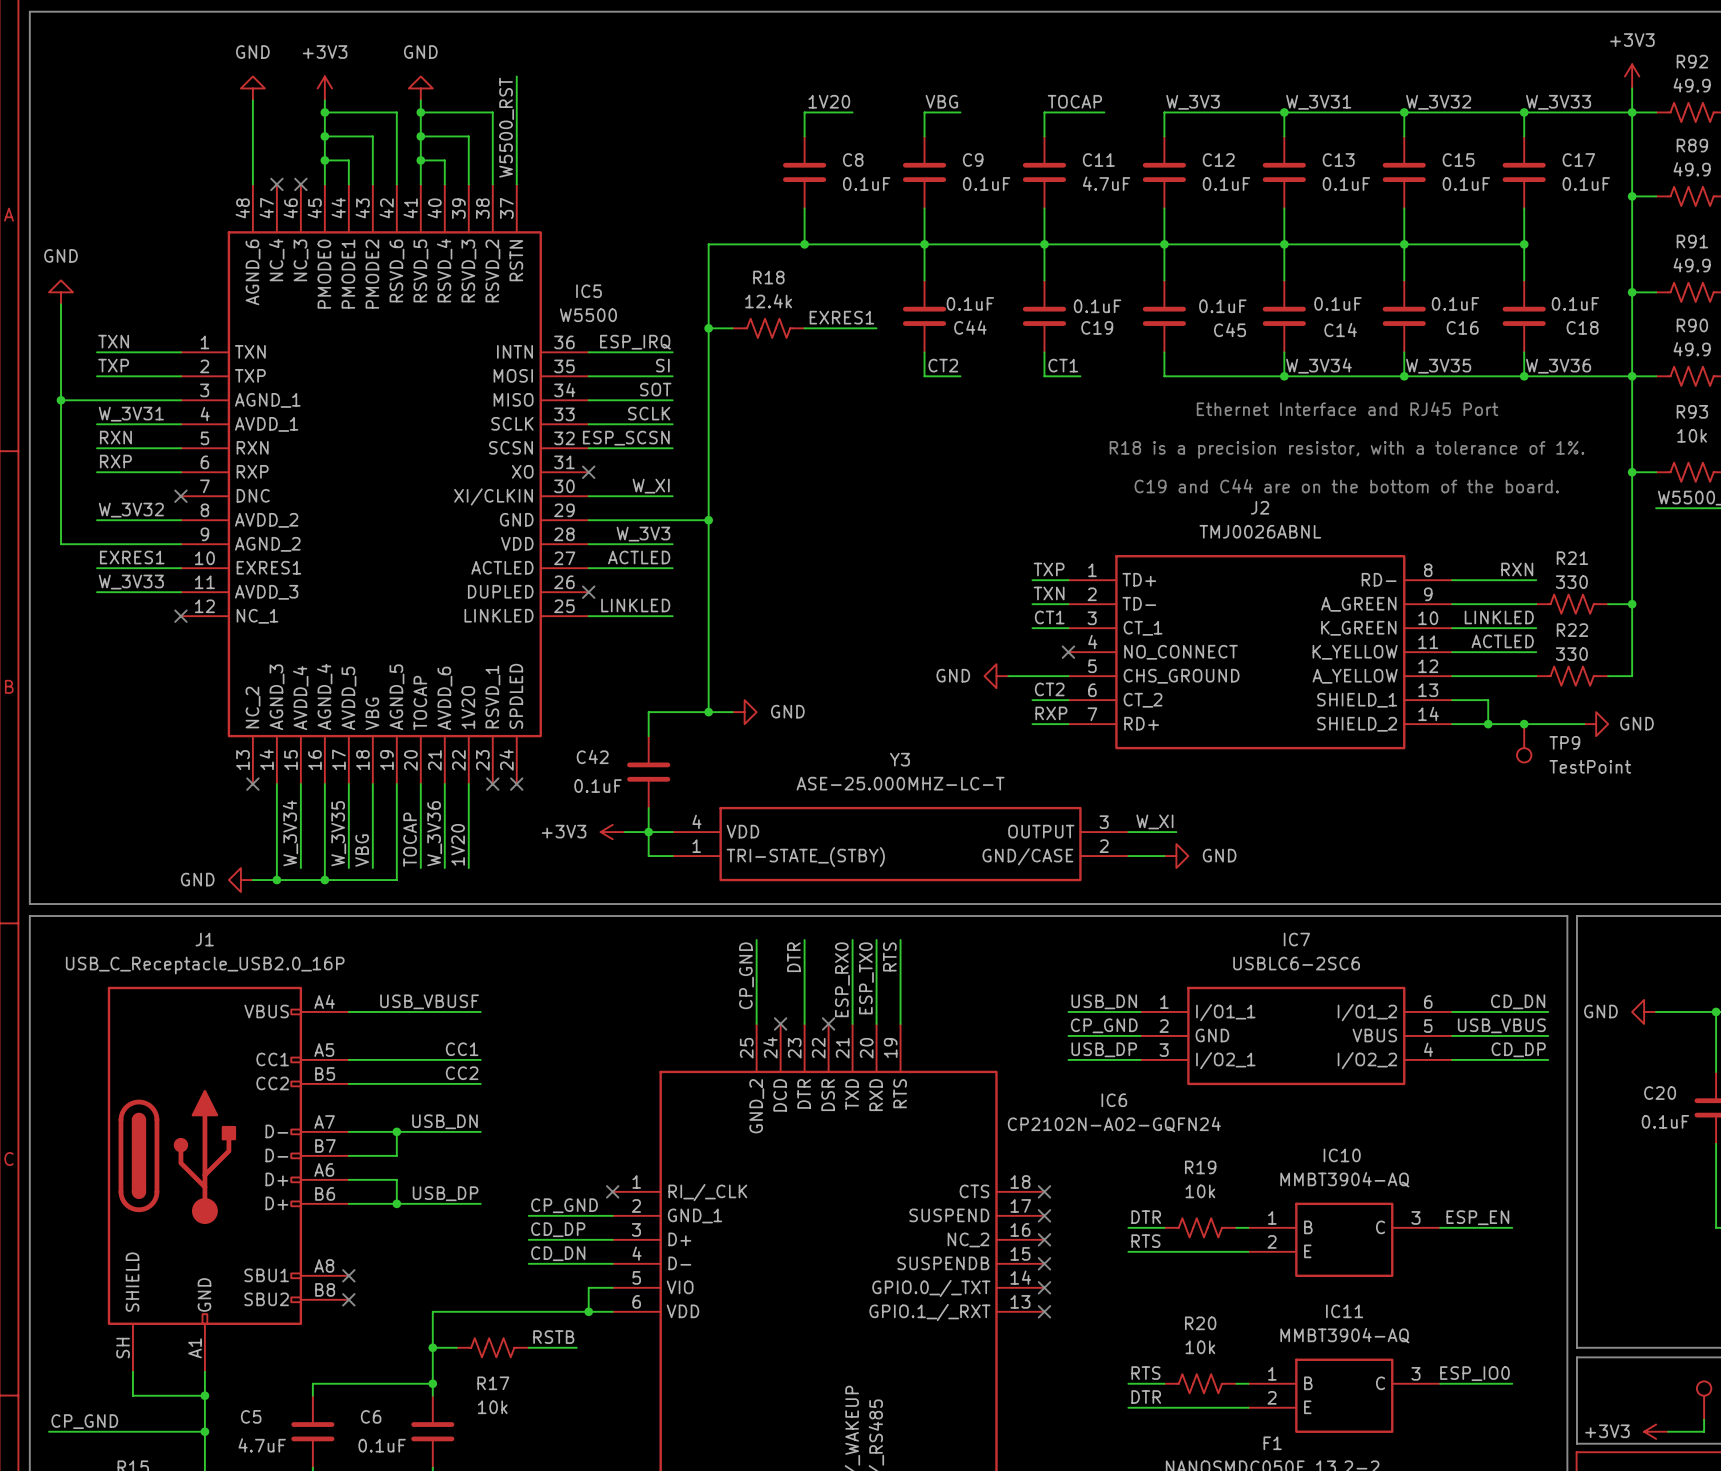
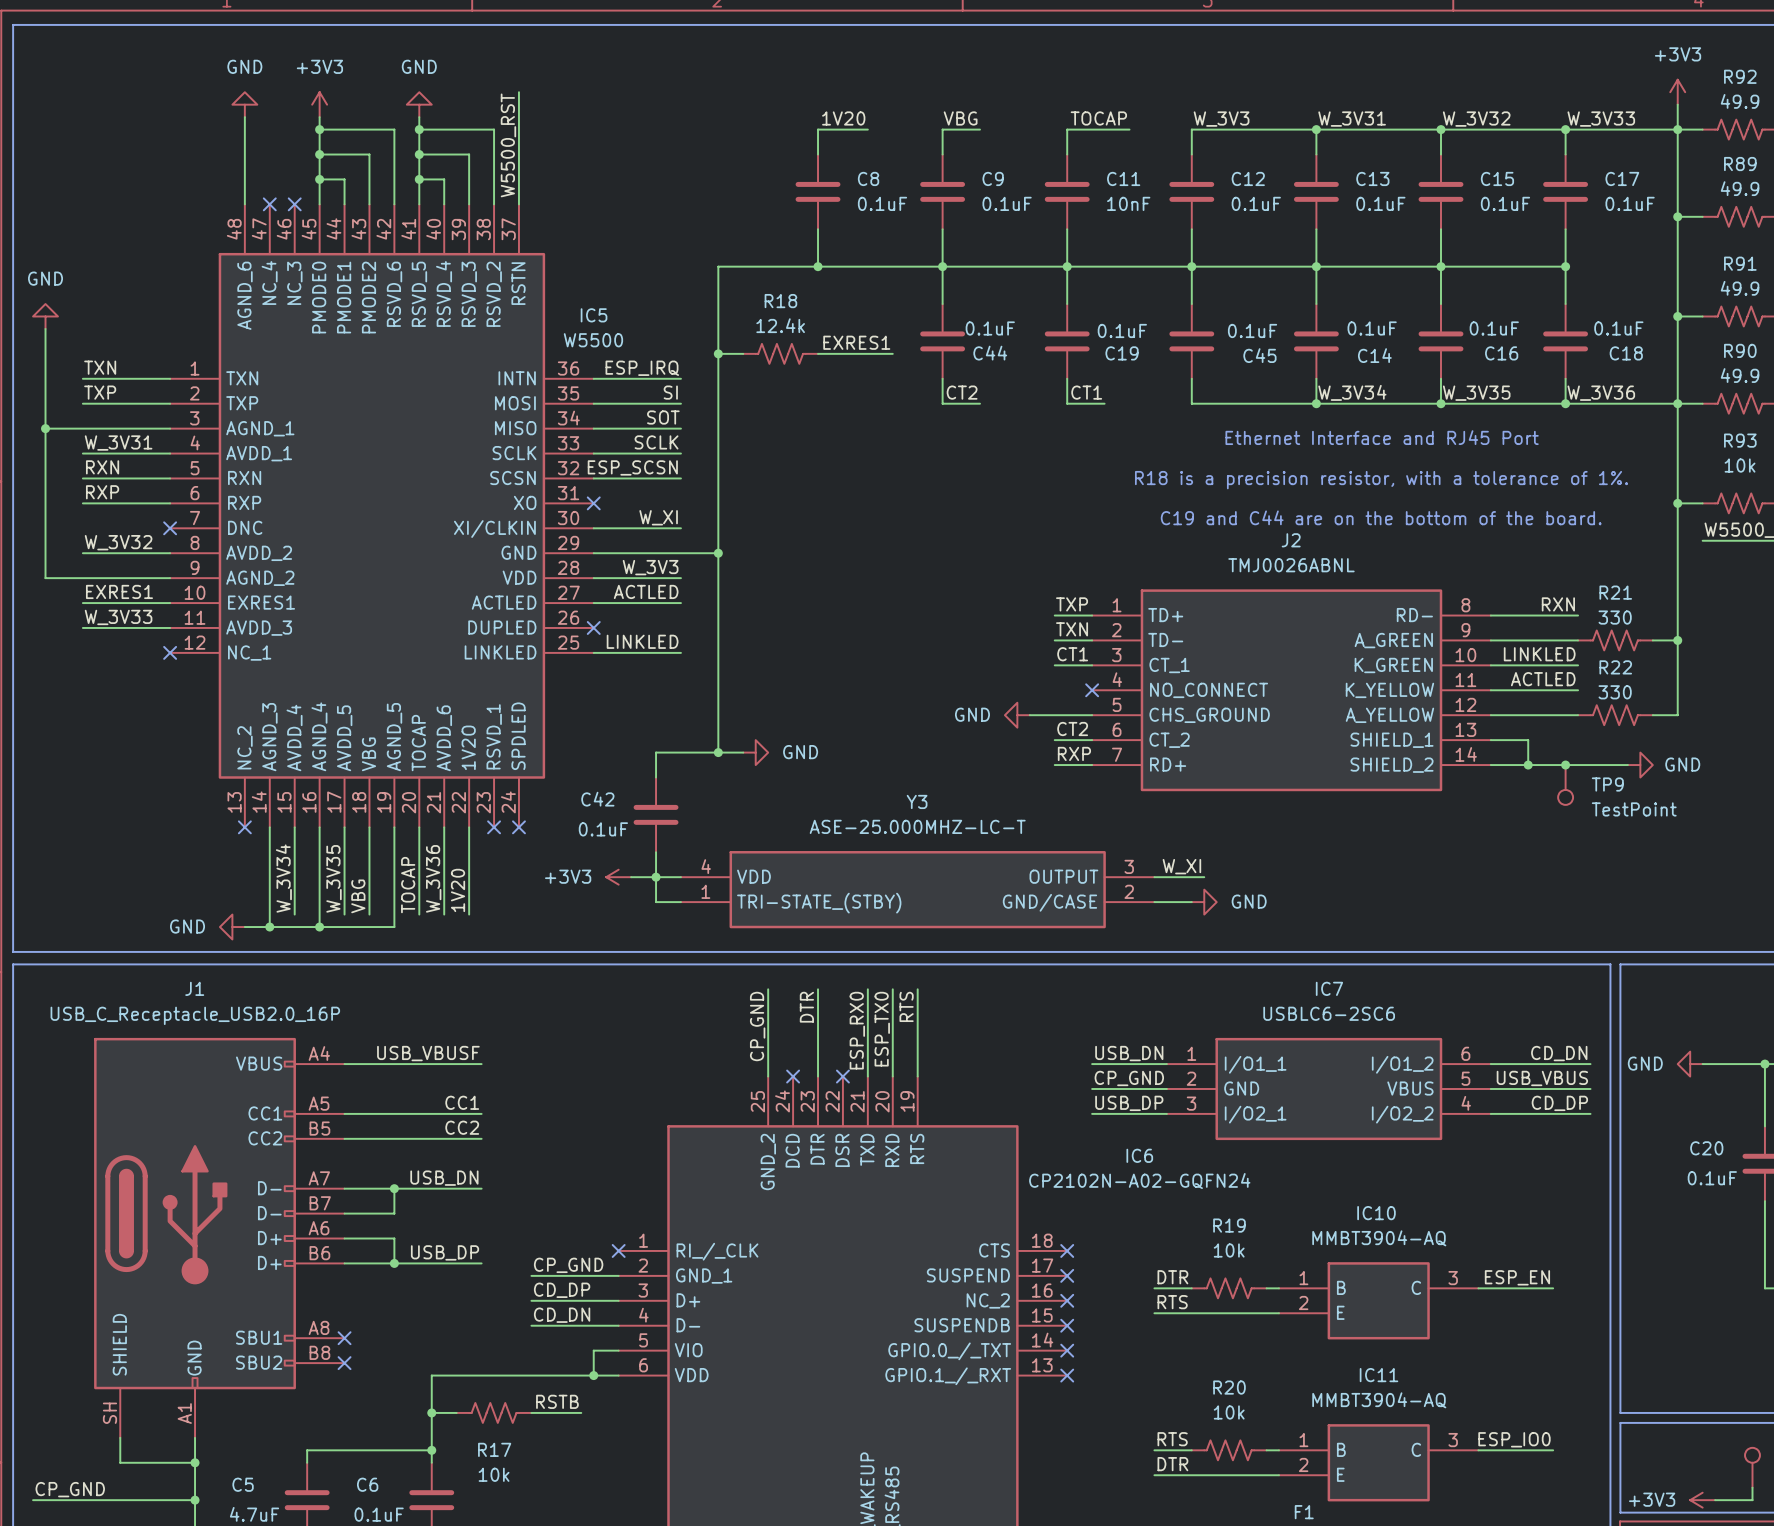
C11 value: 4.7uF (1106, 183) -> 10nF (1128, 203)

